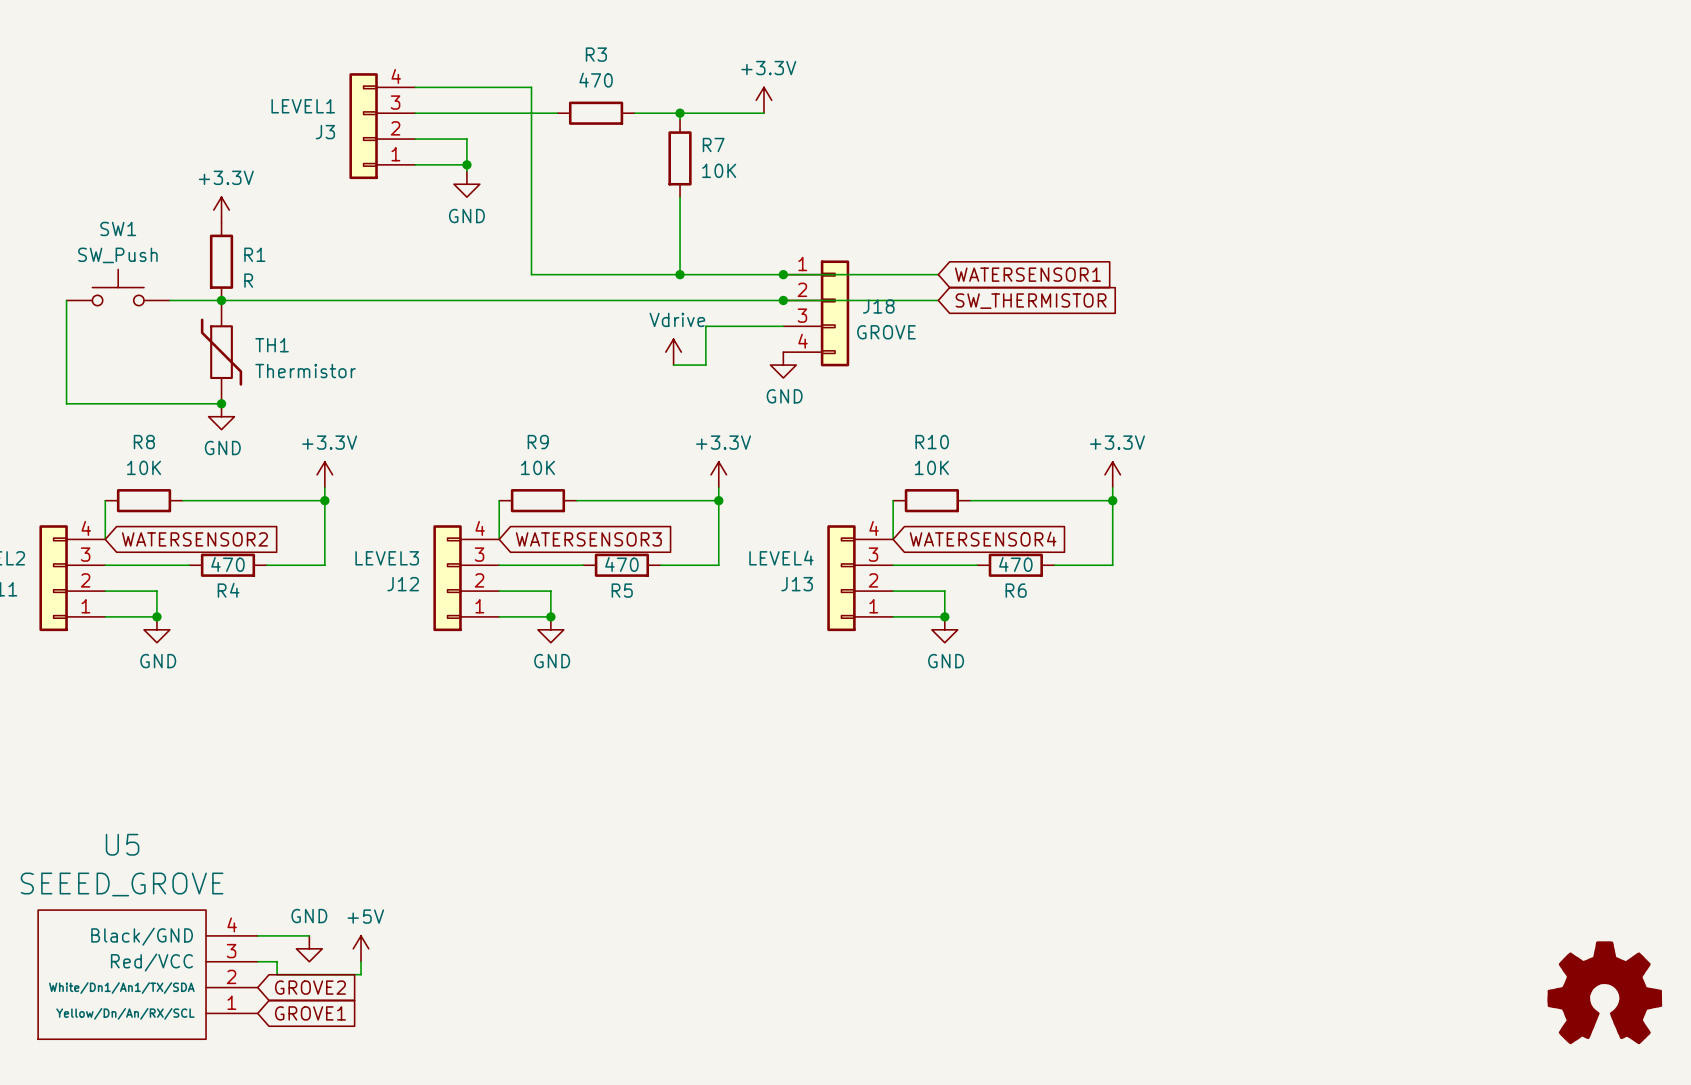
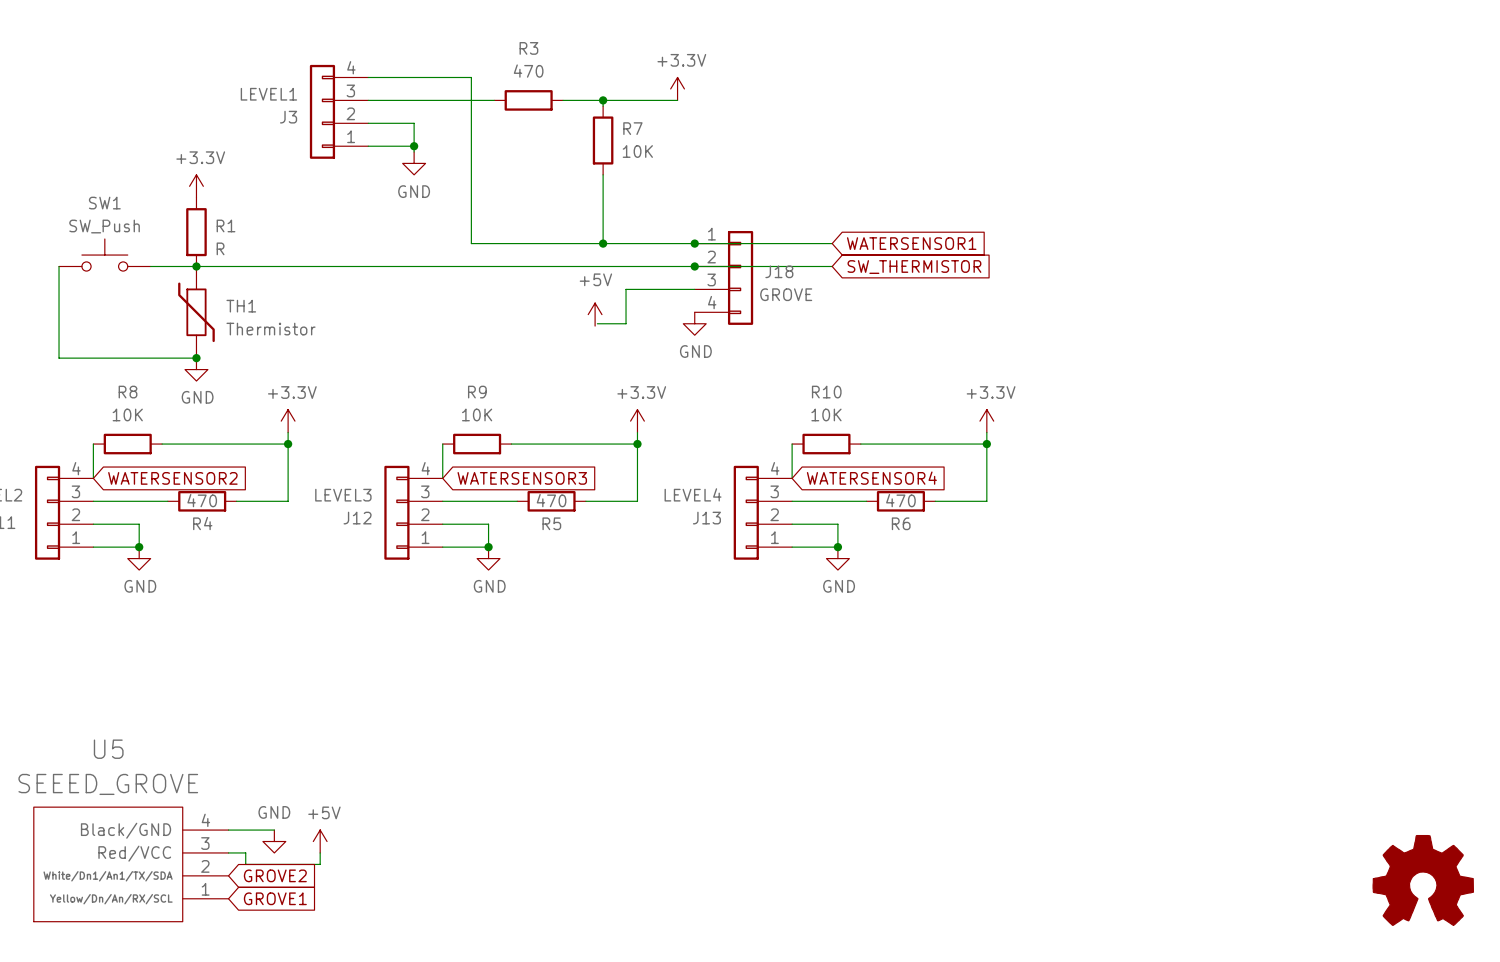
power symbol: Vdrive (673, 352) -> +5V (595, 314)

